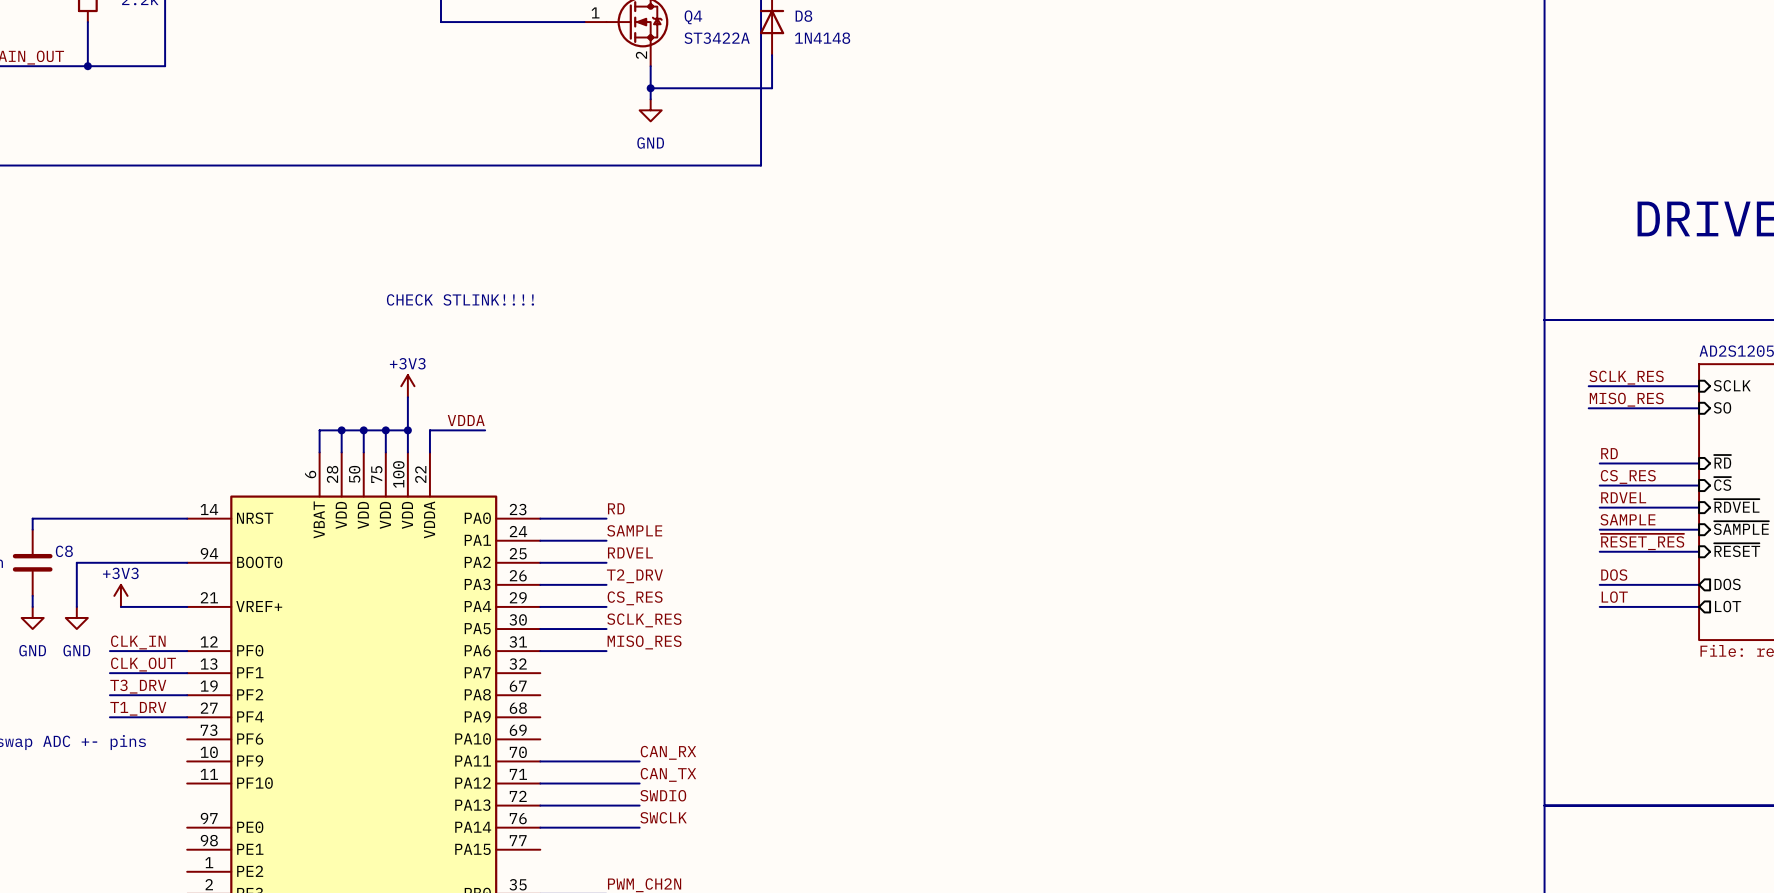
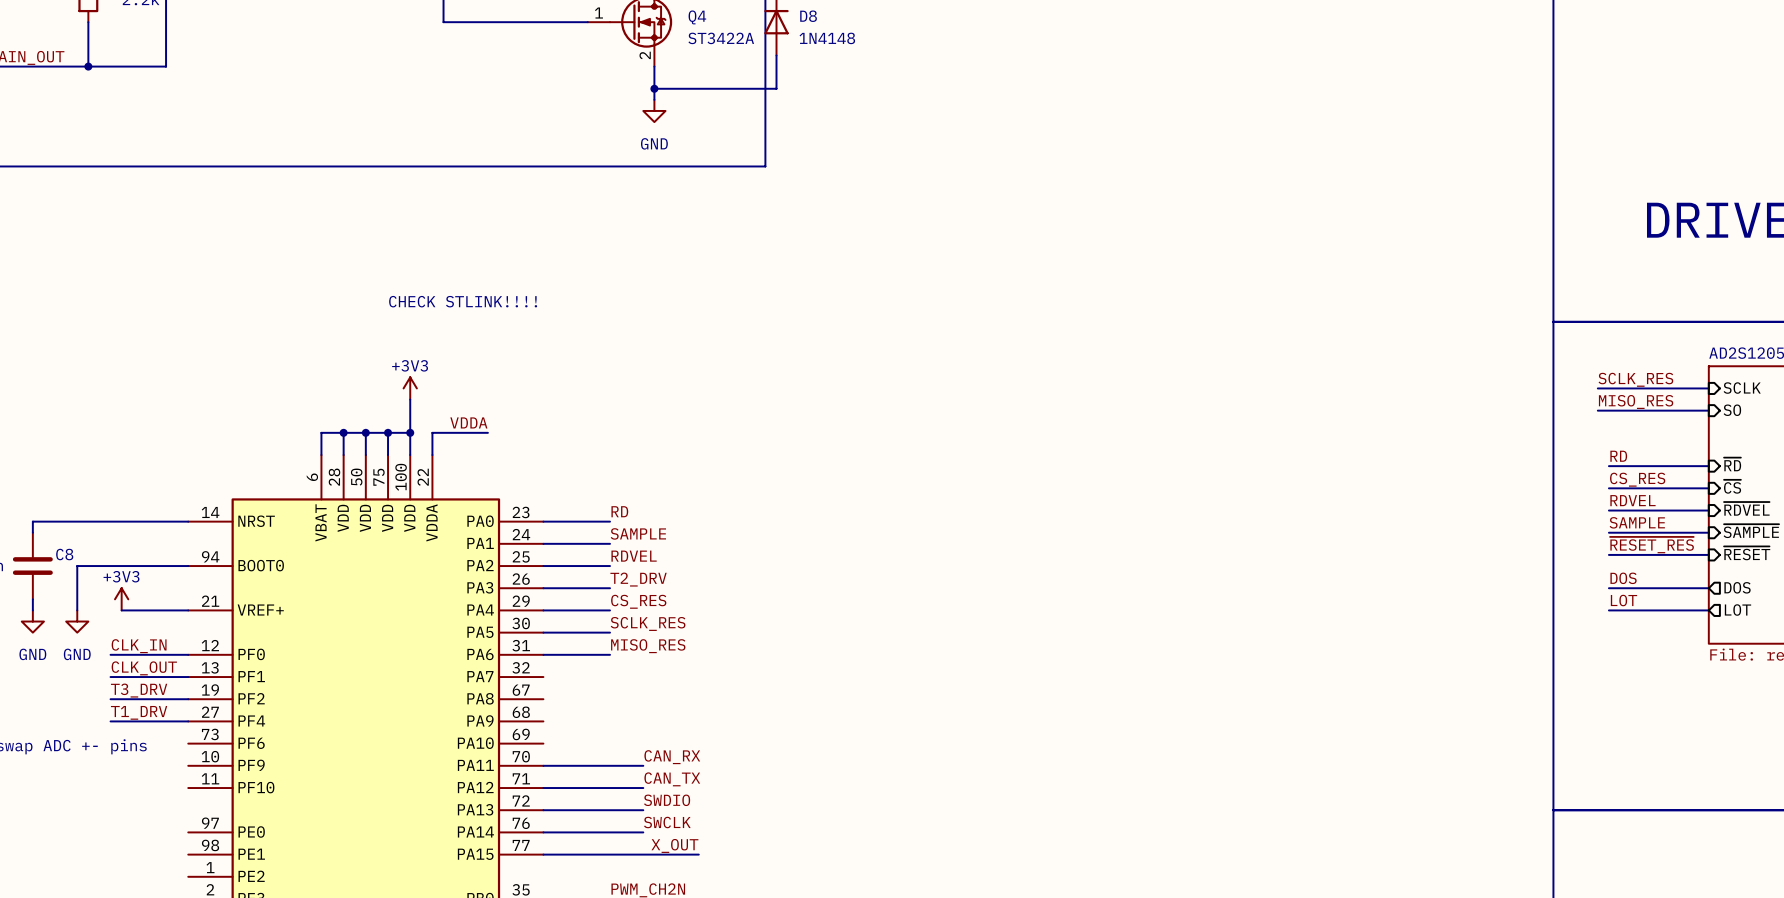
label: none -> X_OUT (674, 845)
wire: none -> (543, 854) (698, 854)

